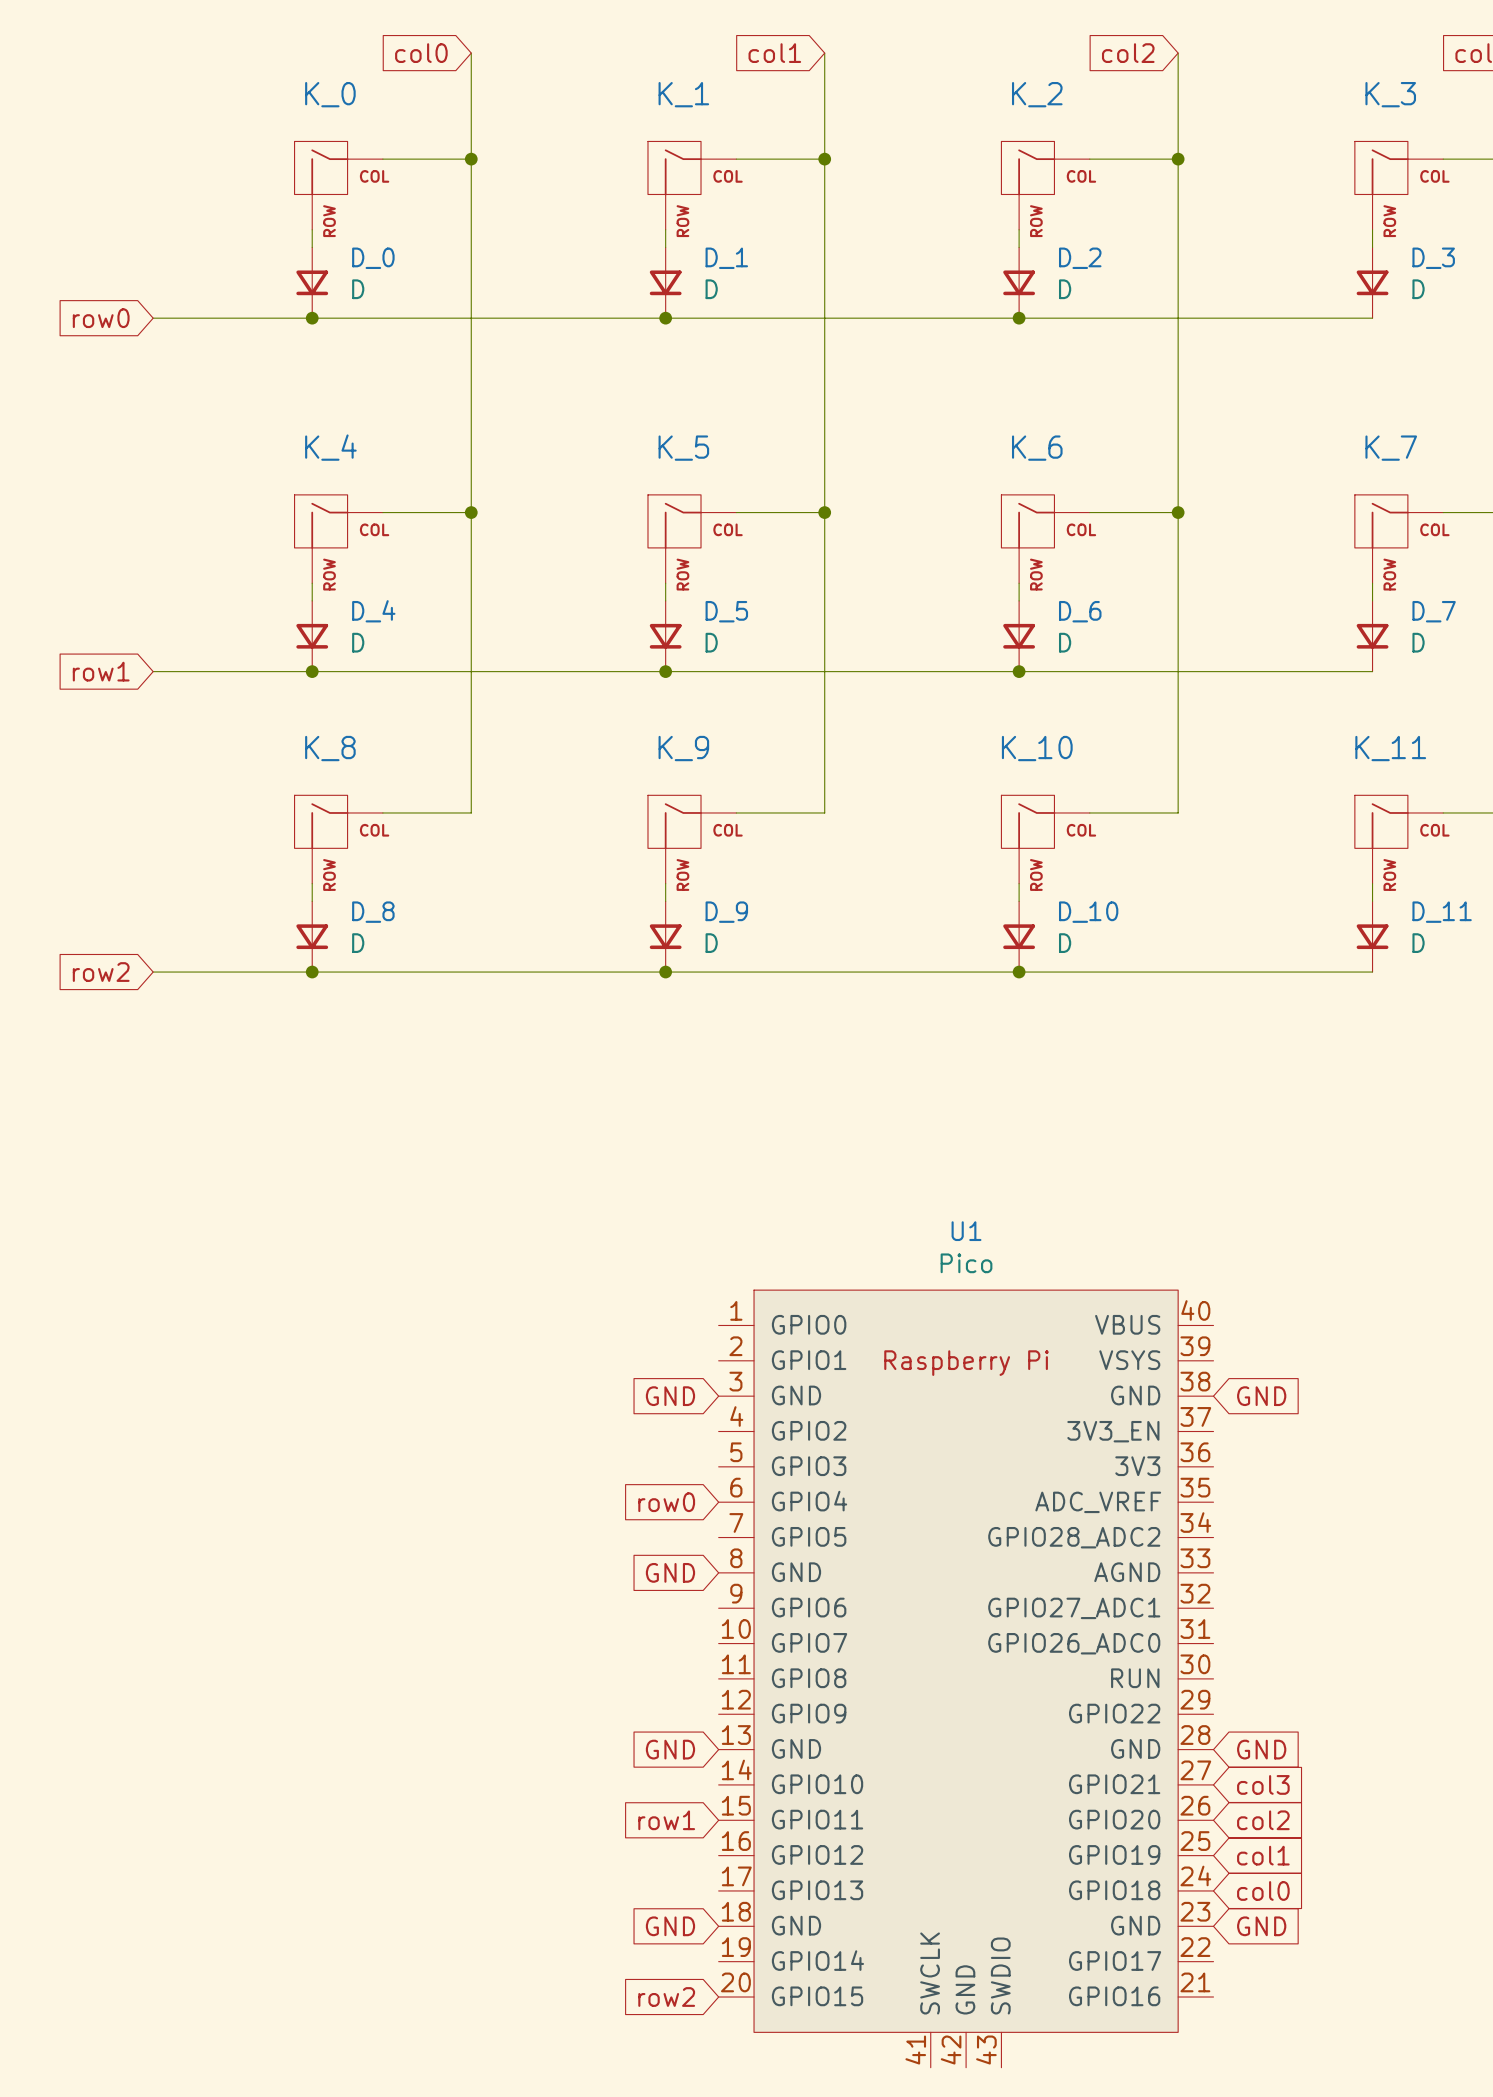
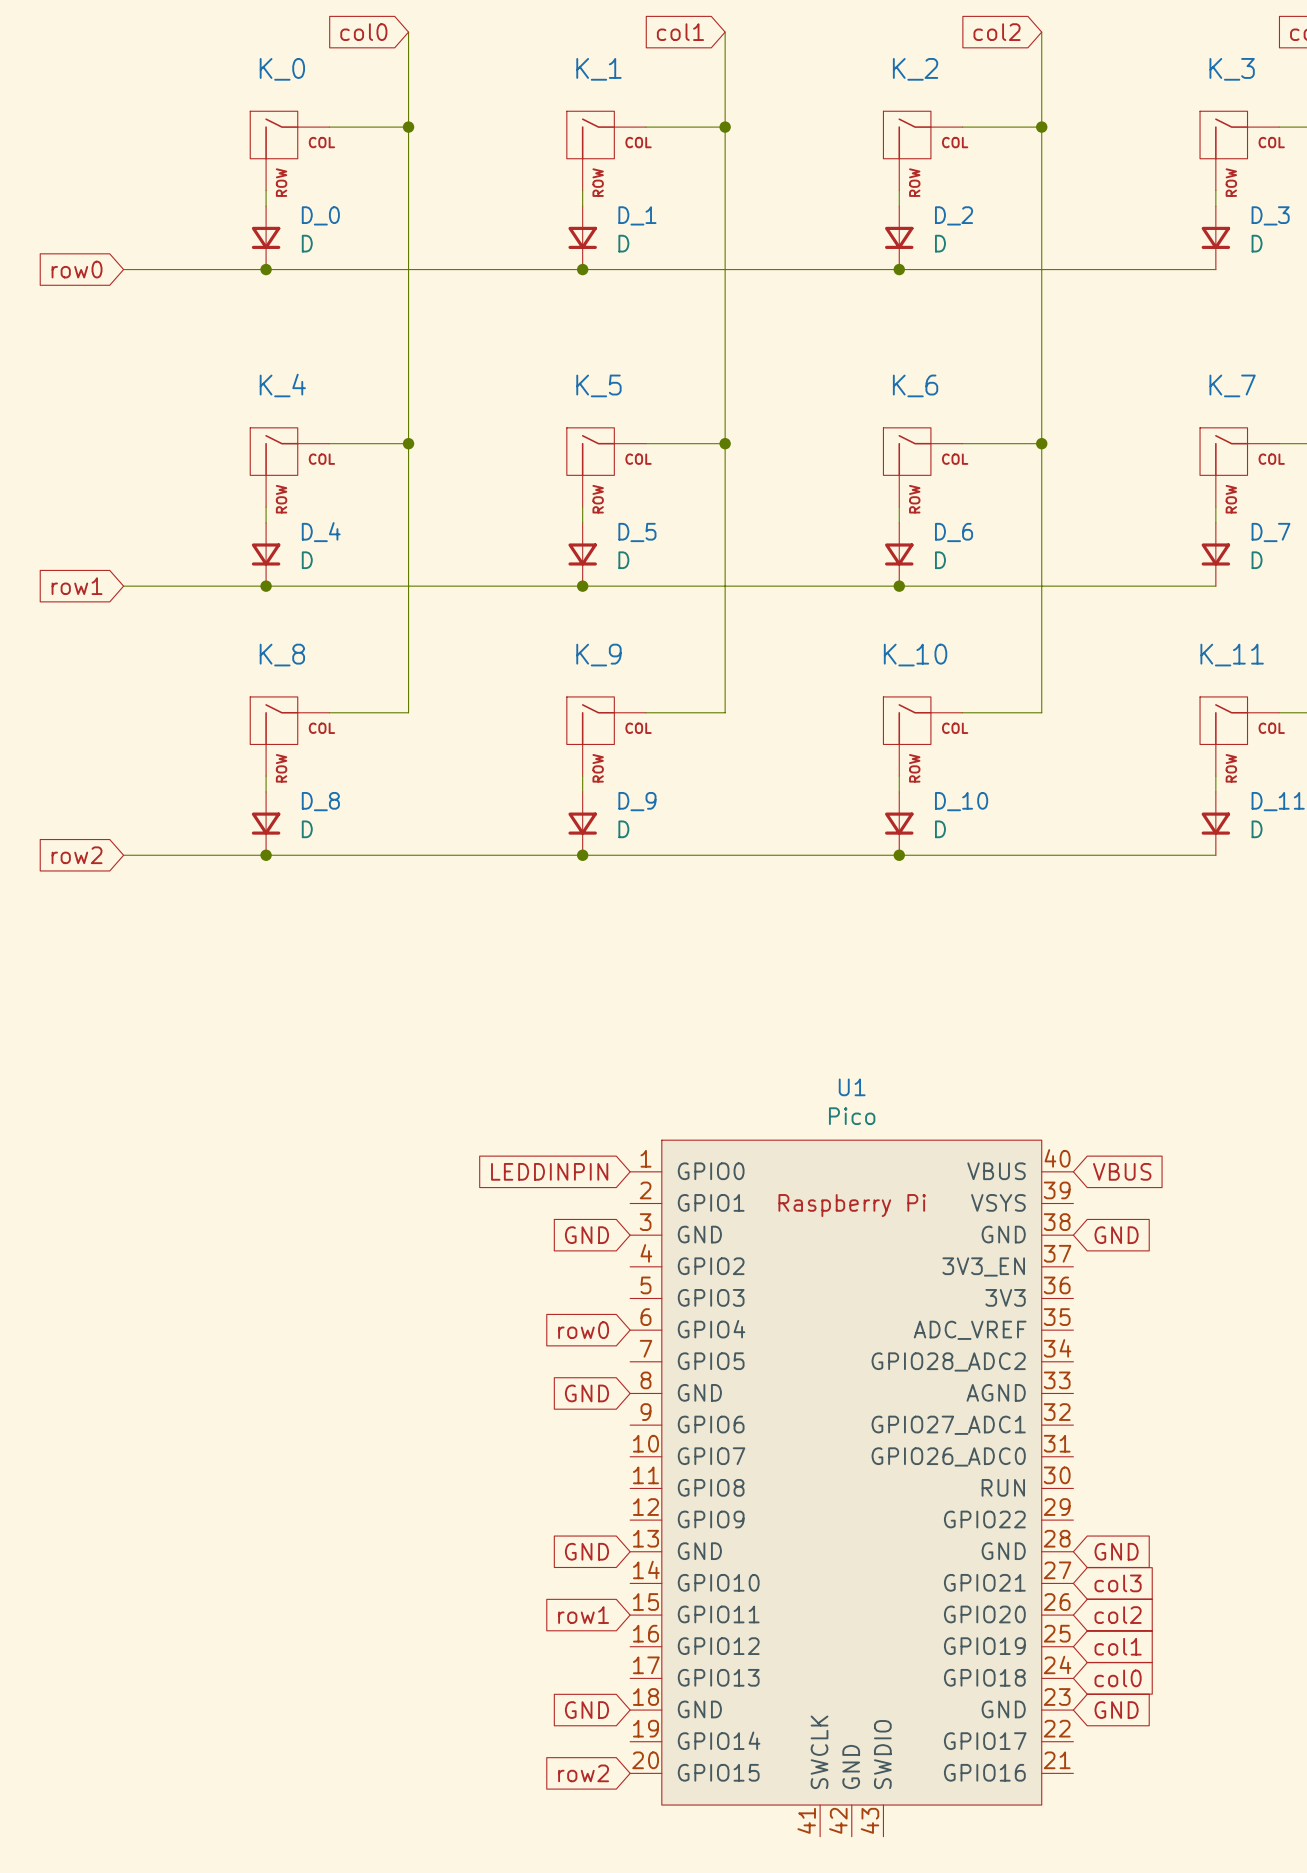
global label: none -> LEDDINPIN (549, 1171)
global label: none -> VBUS (1122, 1171)

